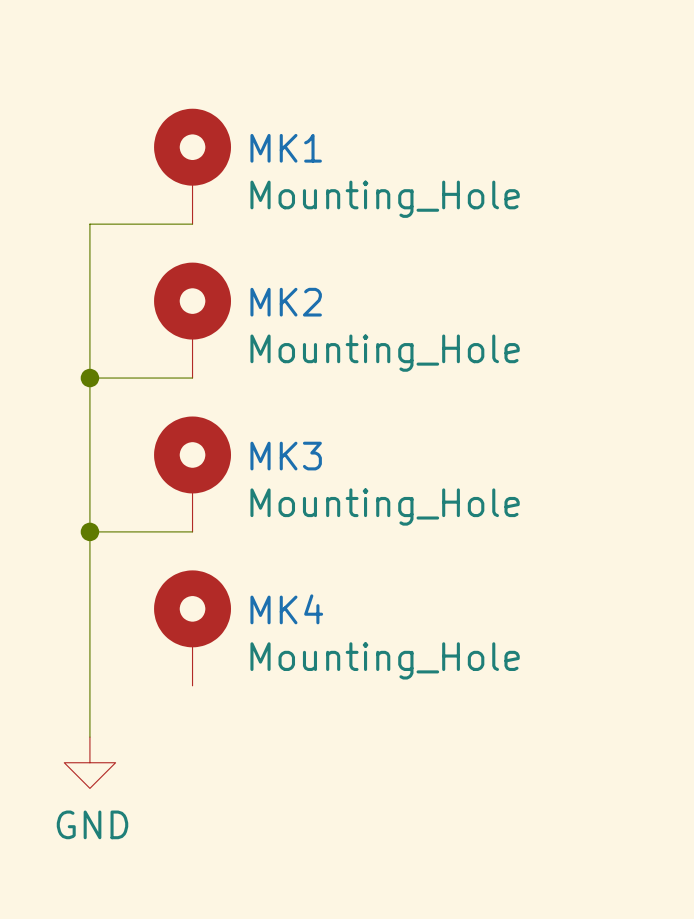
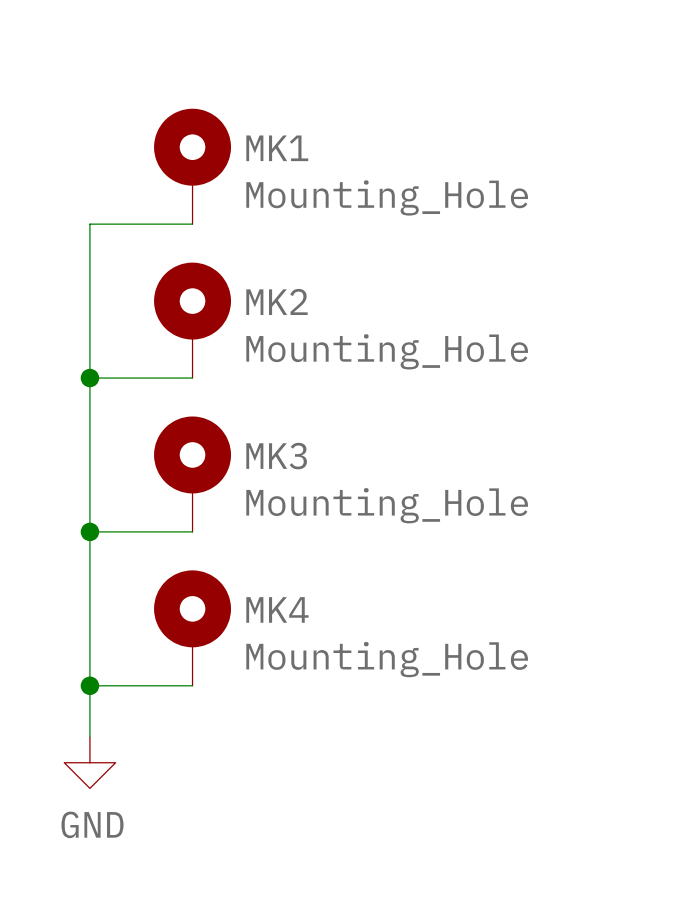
wire: none -> (89, 685) (192, 685)
junction: none -> (89, 685)

